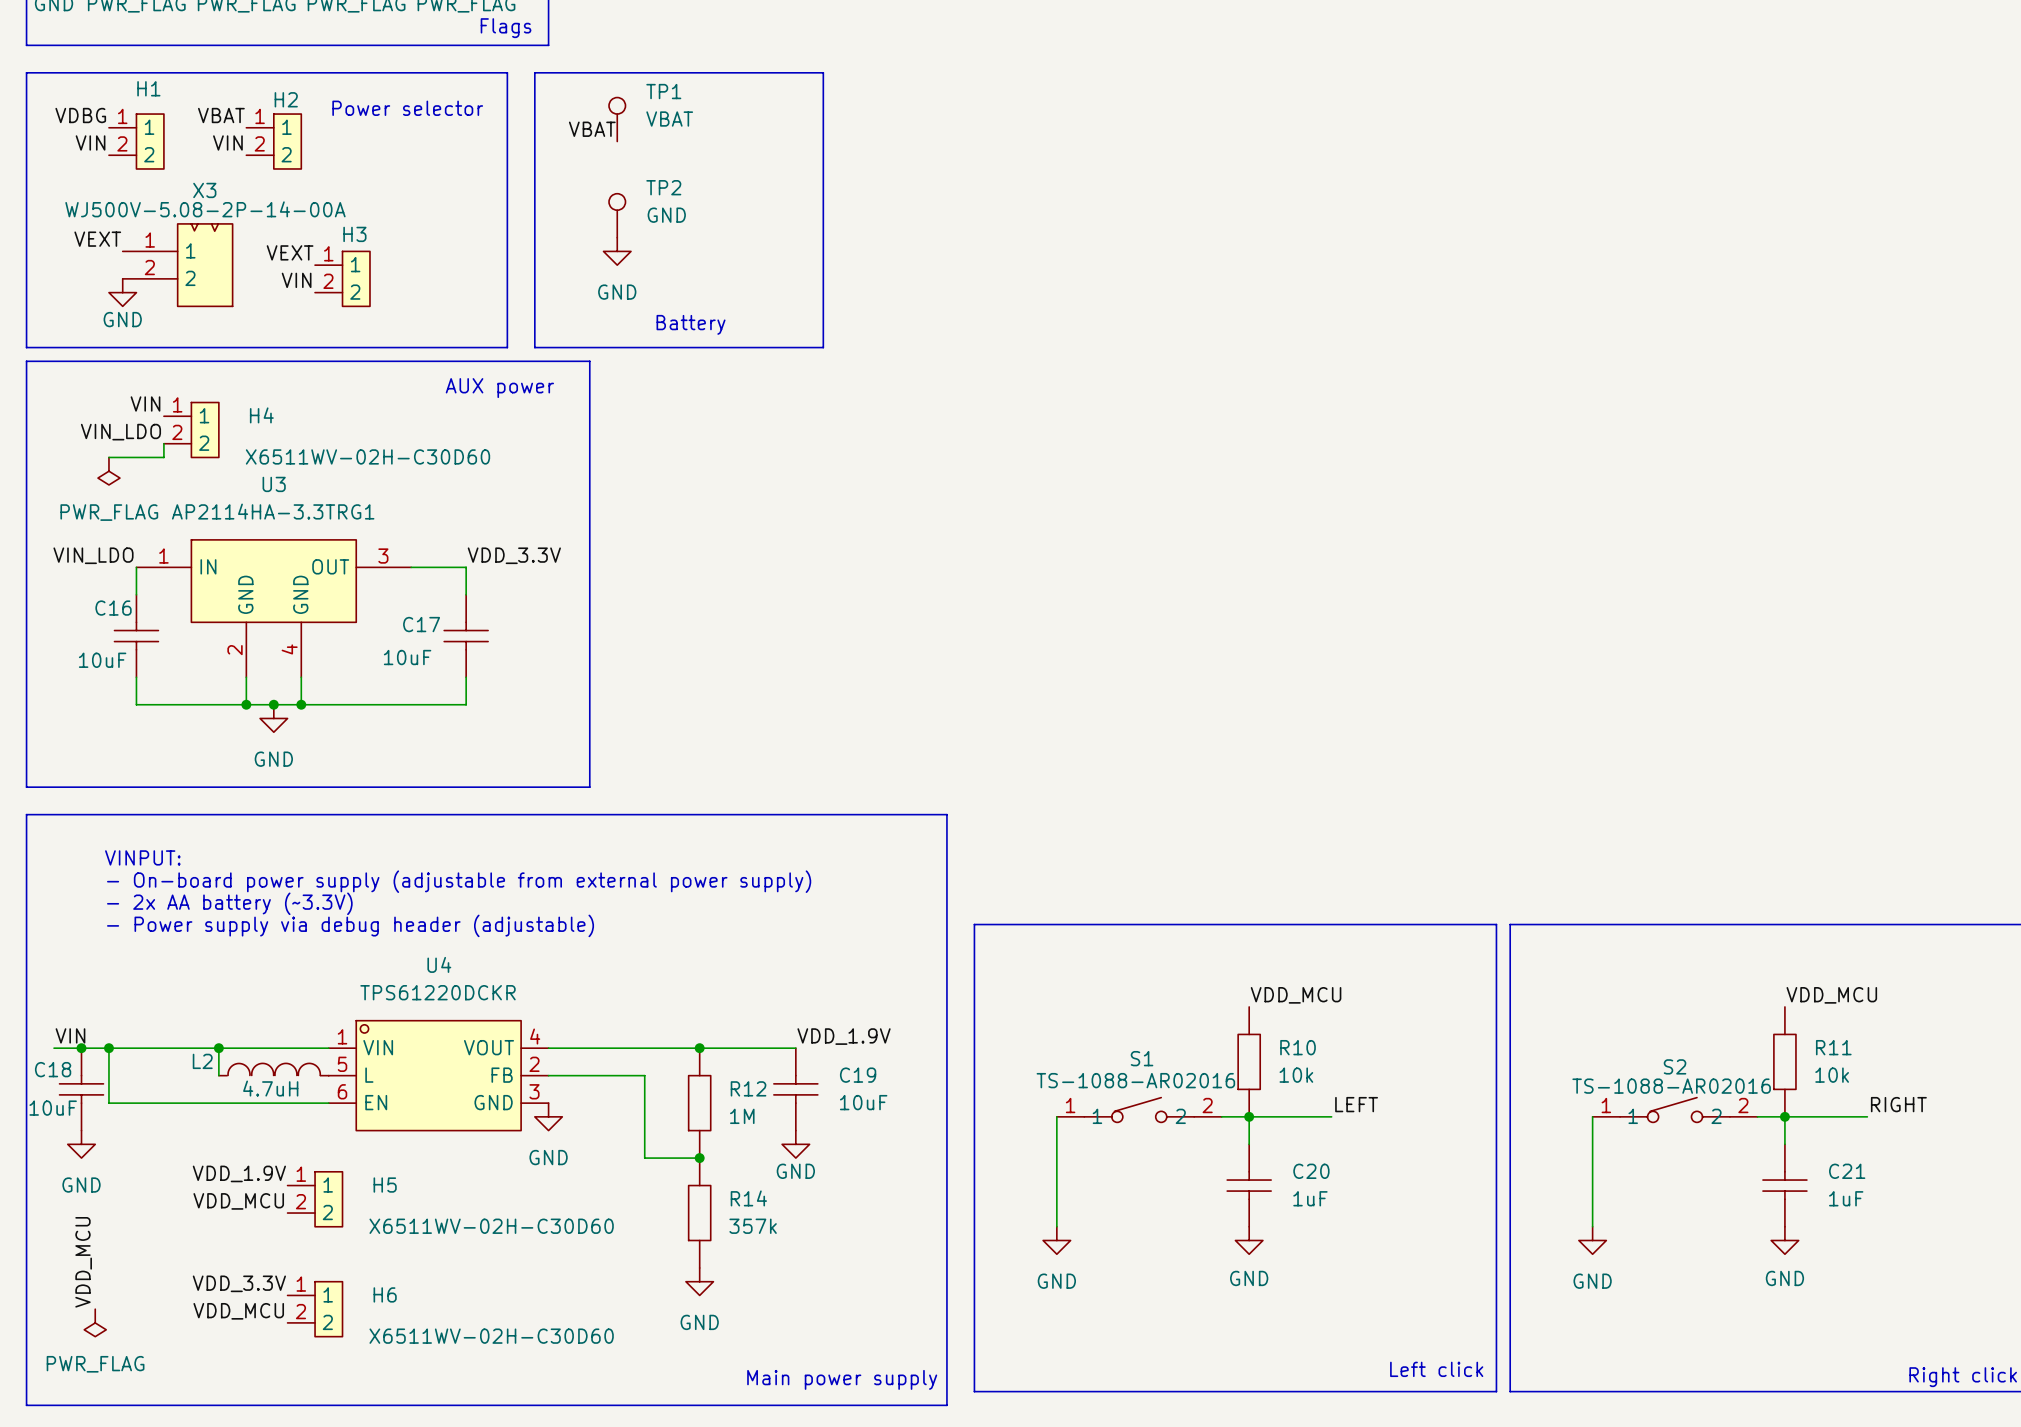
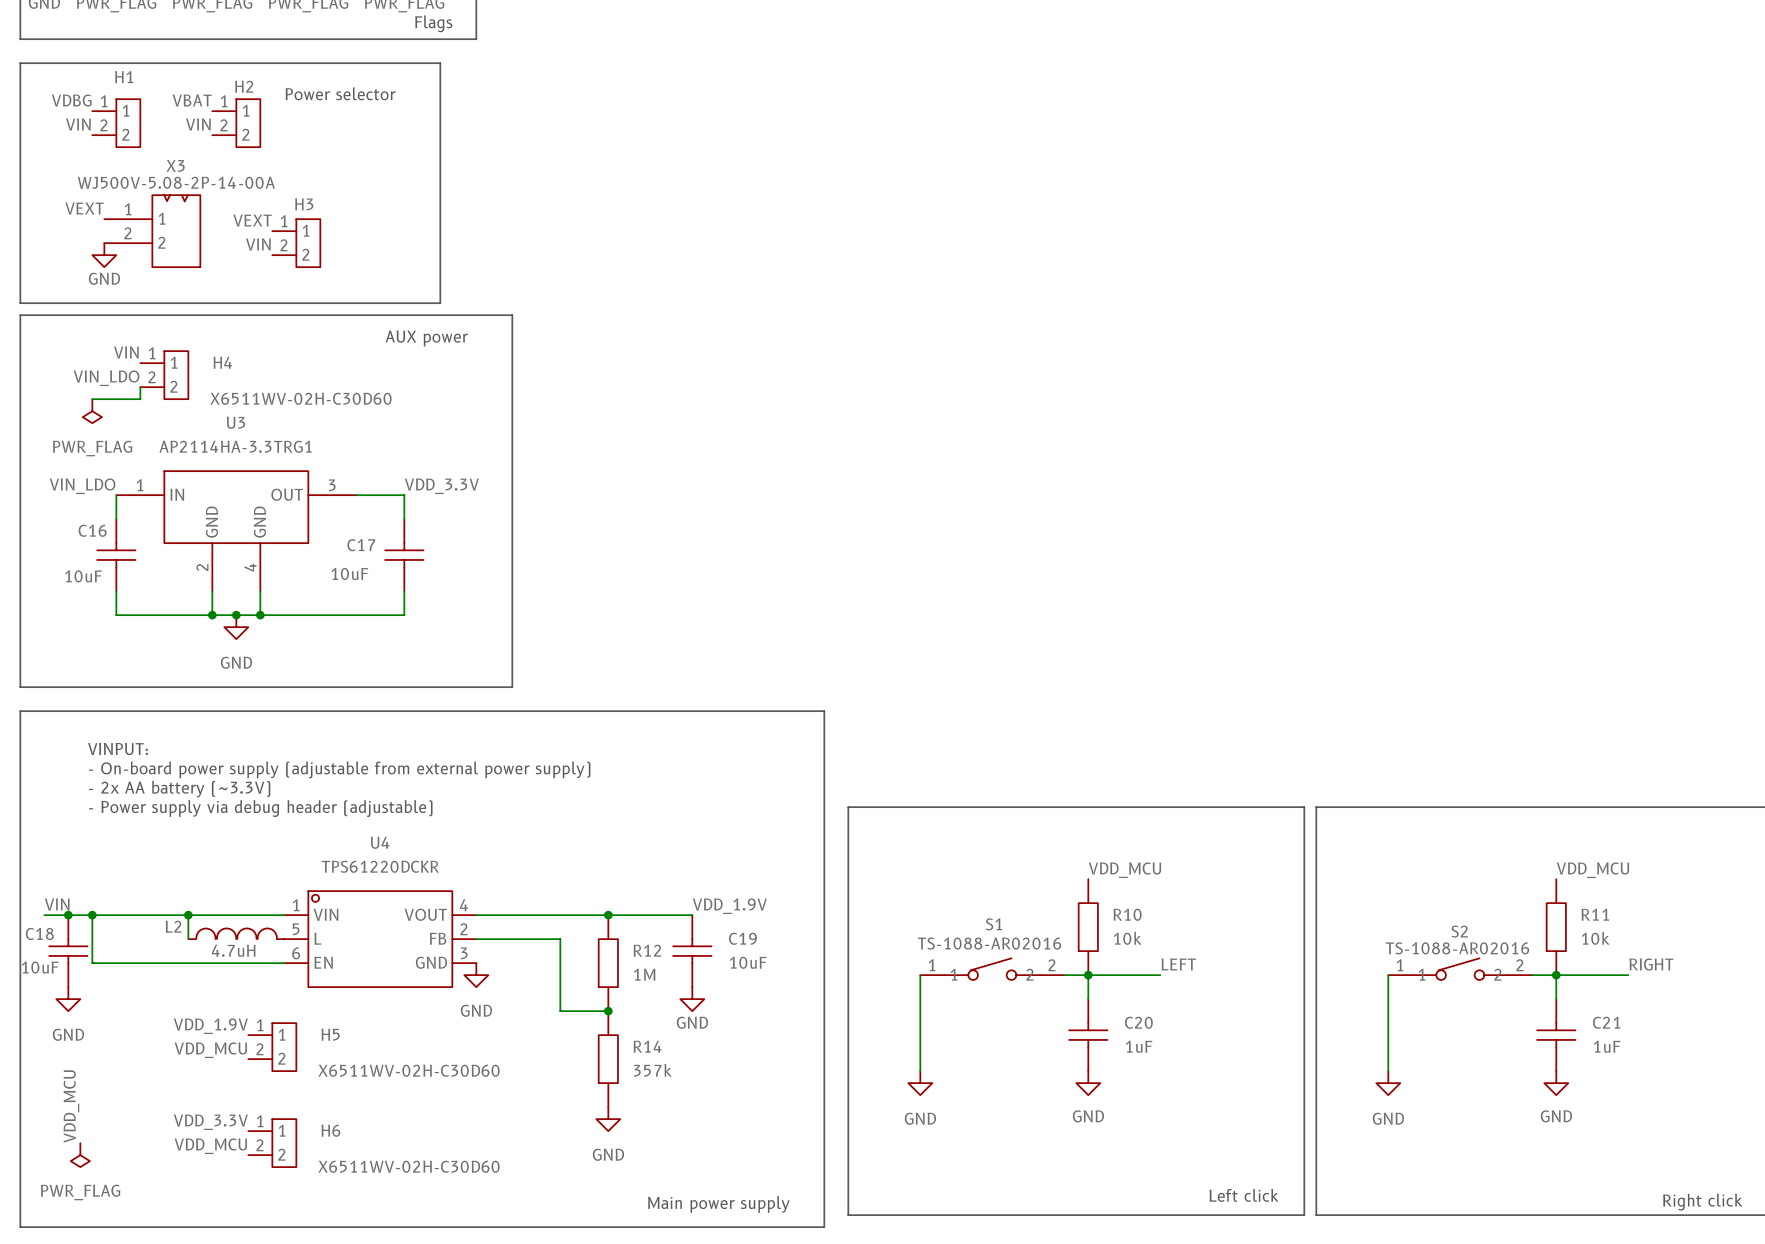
line: (534, 72) (823, 72) (823, 347) (534, 347) (534, 72) -> none
TP1: VBAT (617, 119) -> none
label: VBAT (592, 129) -> none
TP2: GND (617, 215) -> none
power symbol: GND (617, 251) -> none
text: Battery (691, 324) -> none

